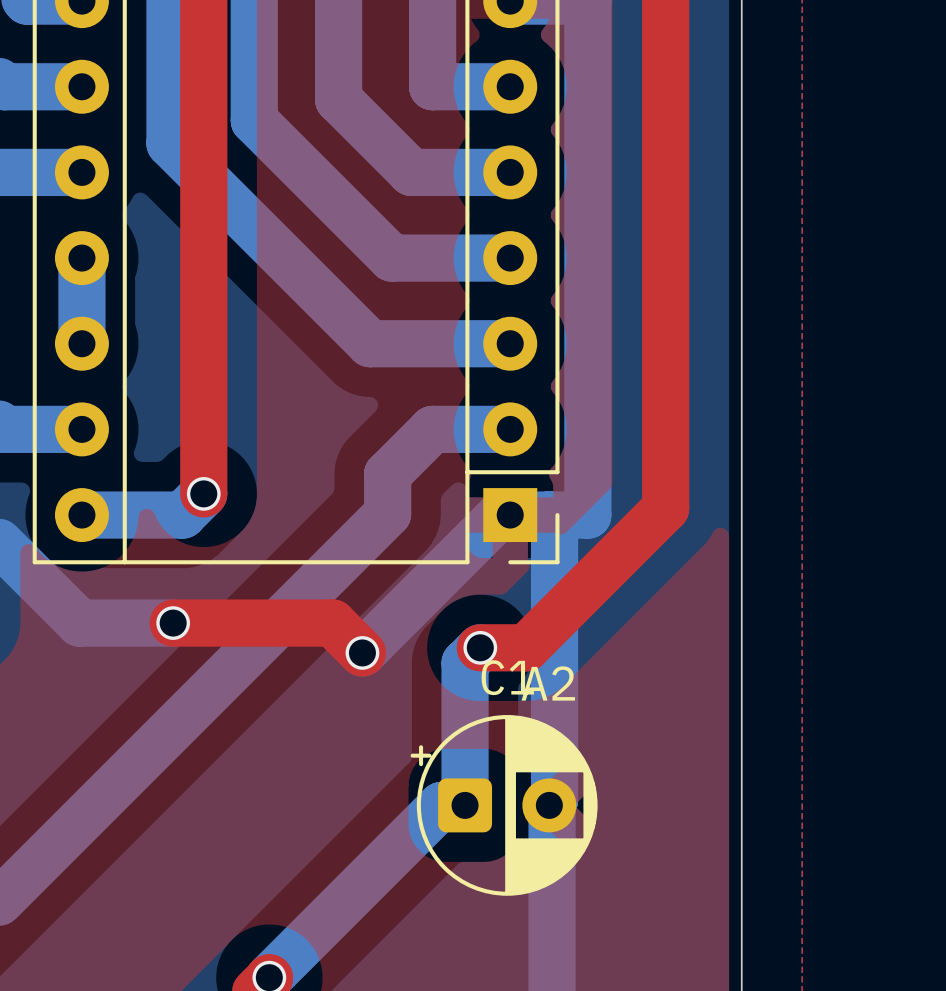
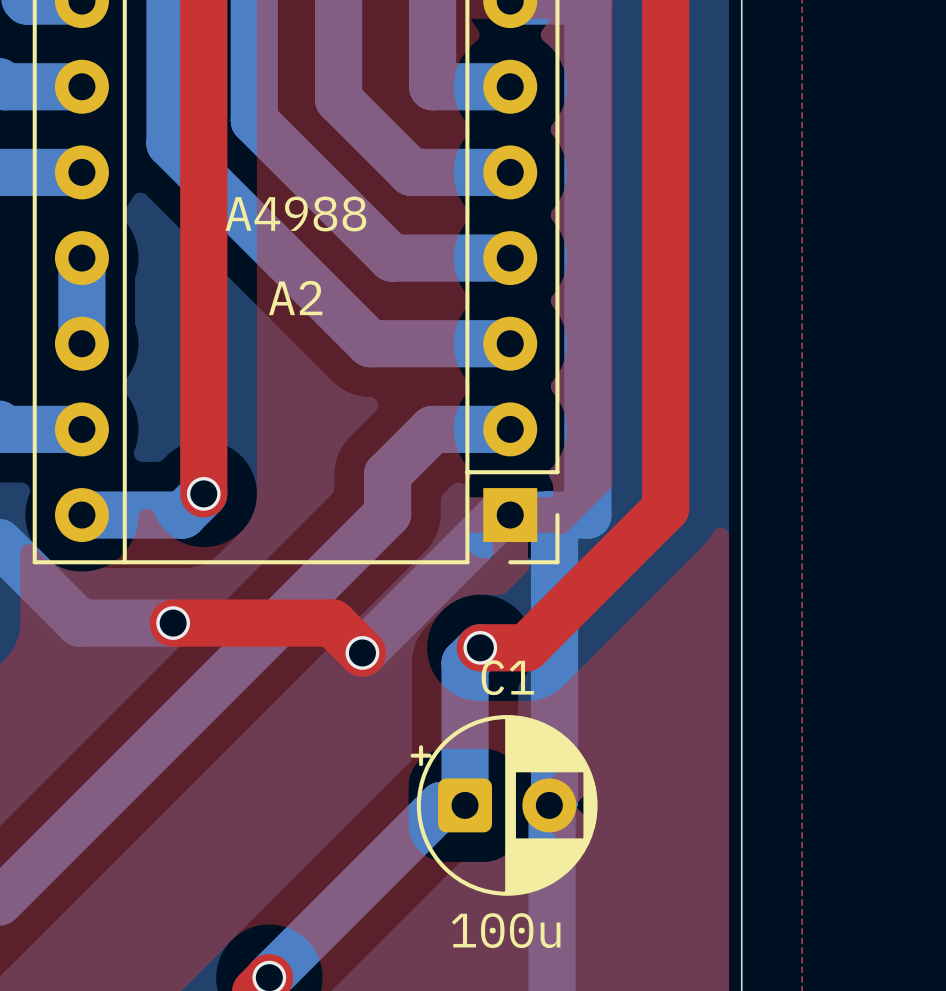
A2 value: none -> A4988 (295, 213)
A2 name position: A2 (548, 683) -> A2 (295, 298)
C1 value: none -> 100u (506, 930)

